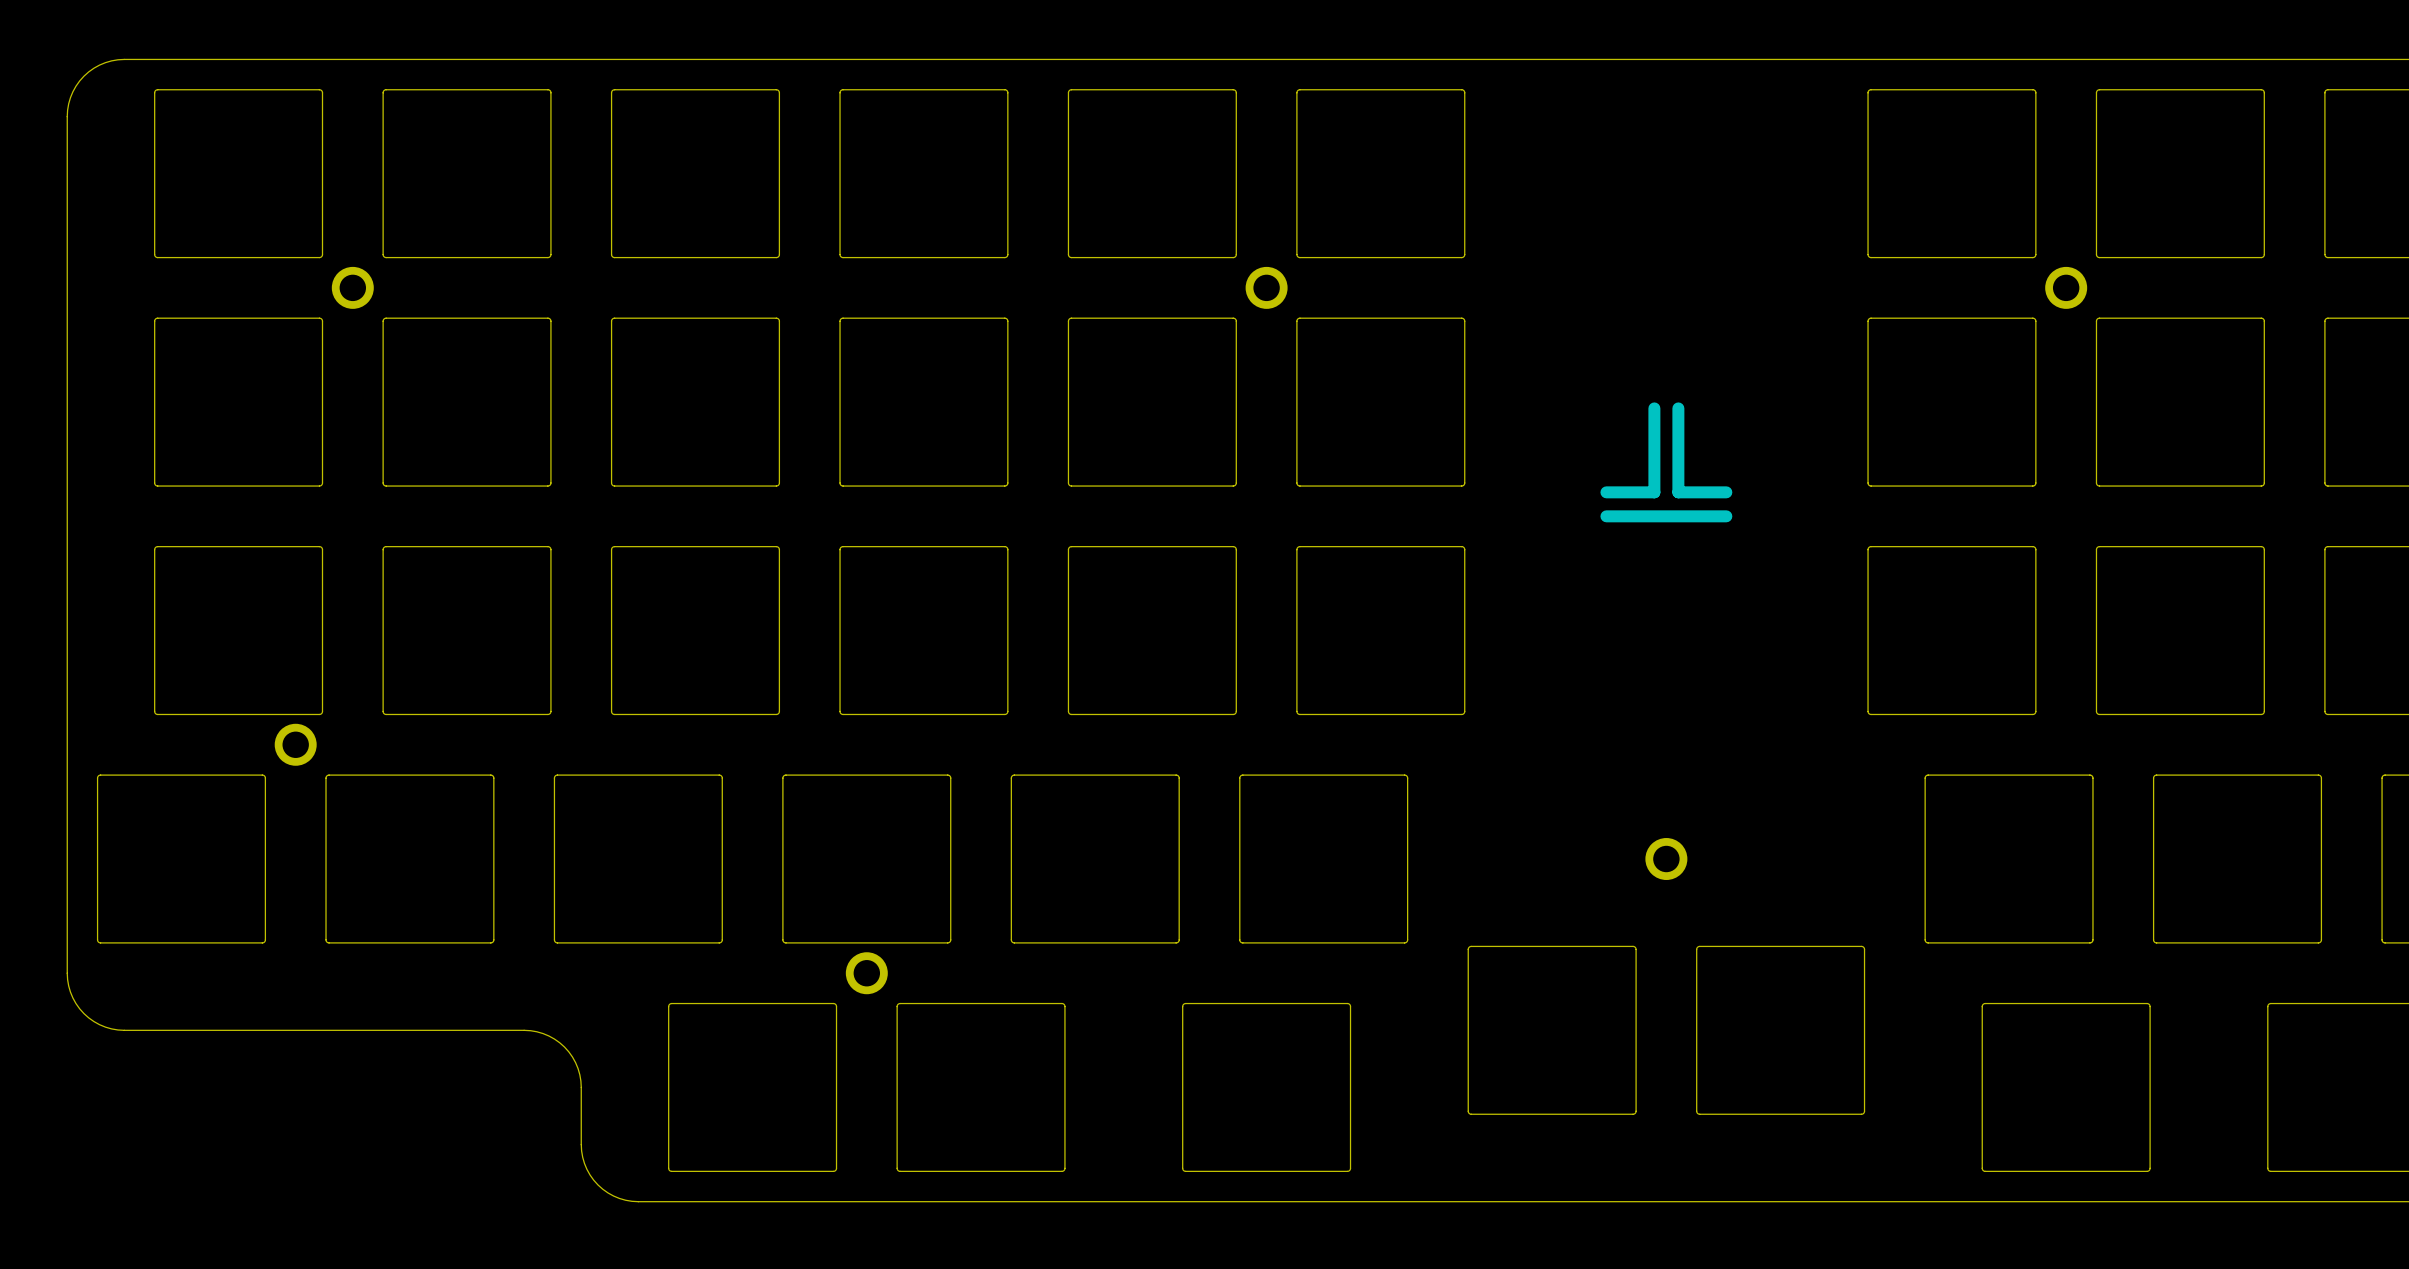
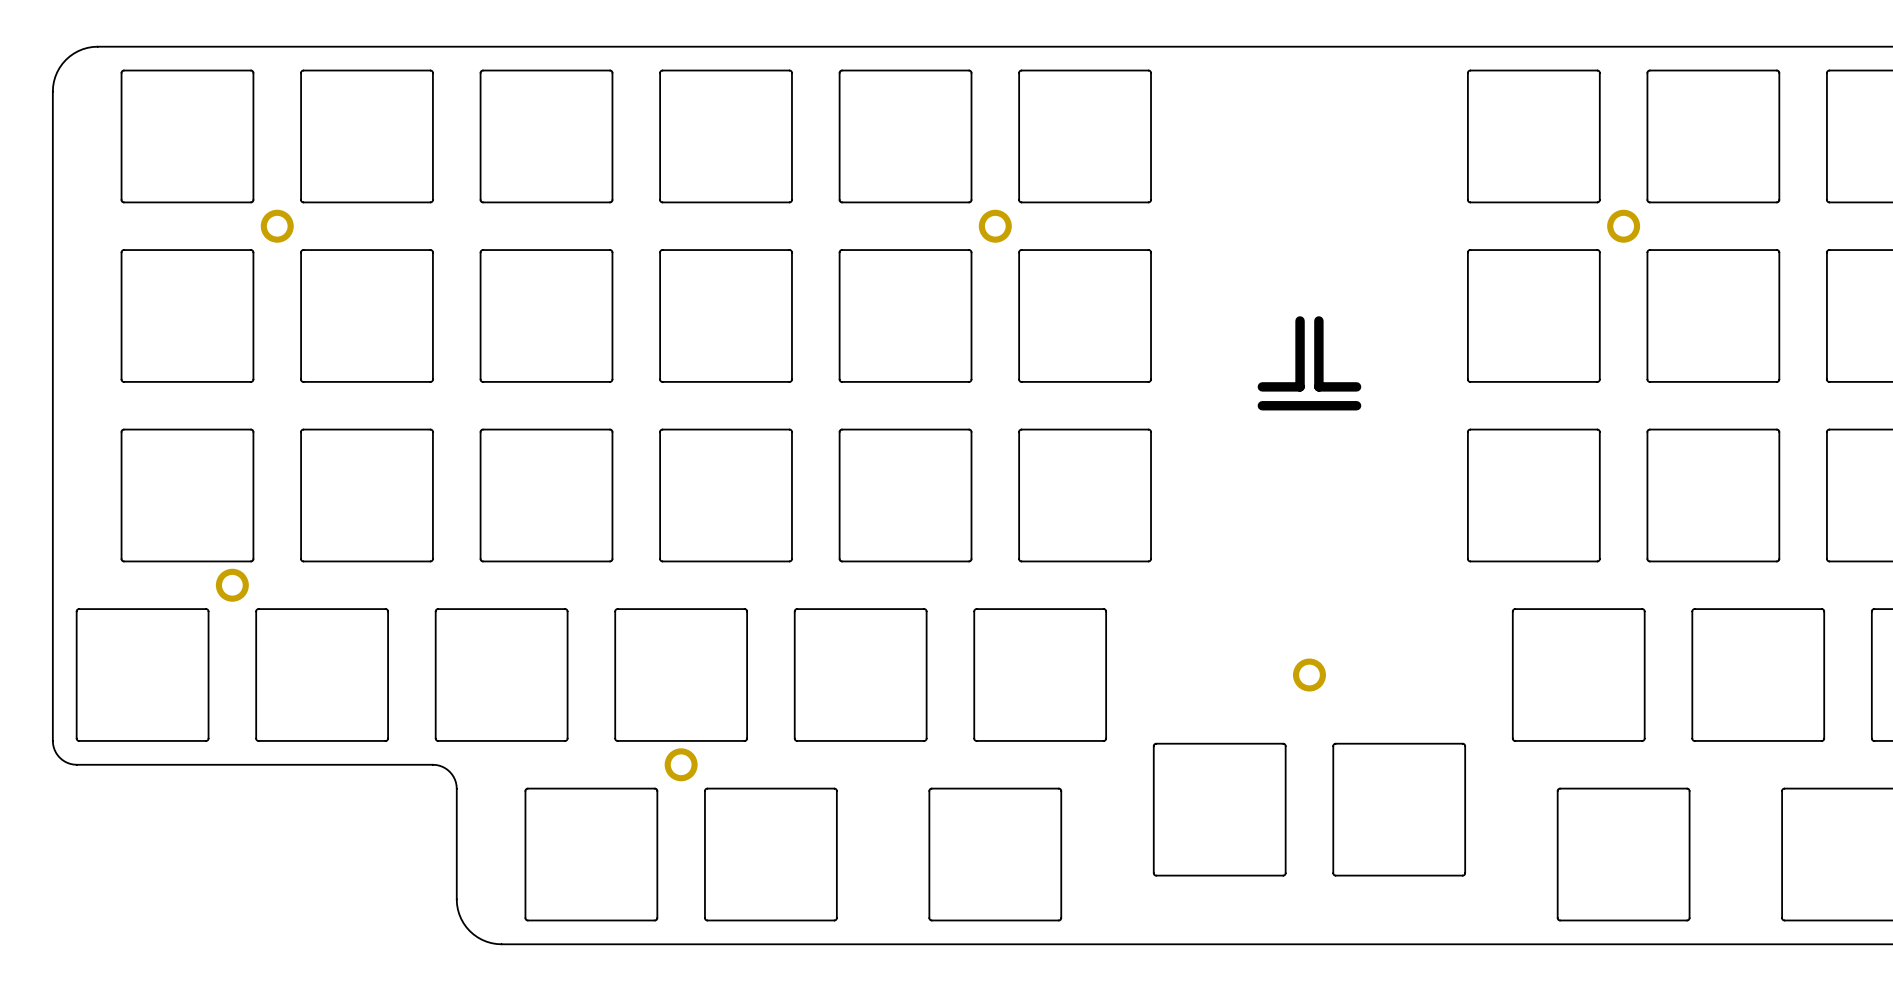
board edge: (67, 942) (67, 979) (72, 998) (88, 1017) (111, 1028) (530, 1030) (554, 1039) (568, 1051) (578, 1068) (581, 1087) -> (52, 740) (54, 750) (59, 757) (67, 762) (76, 764) (439, 765) (449, 771) (455, 782) (456, 854)

